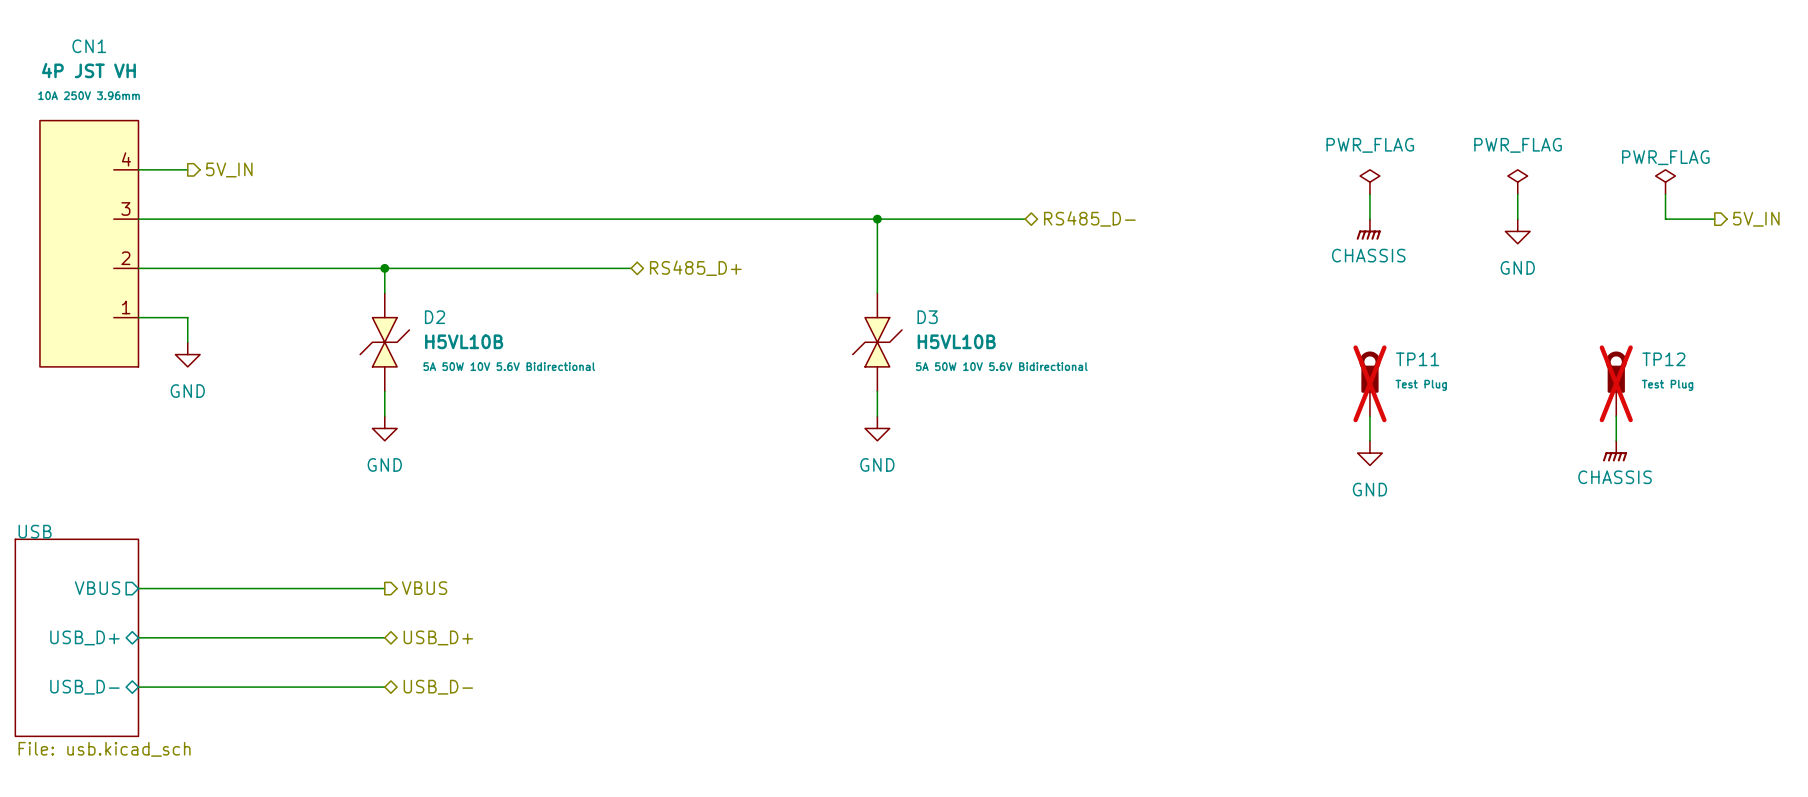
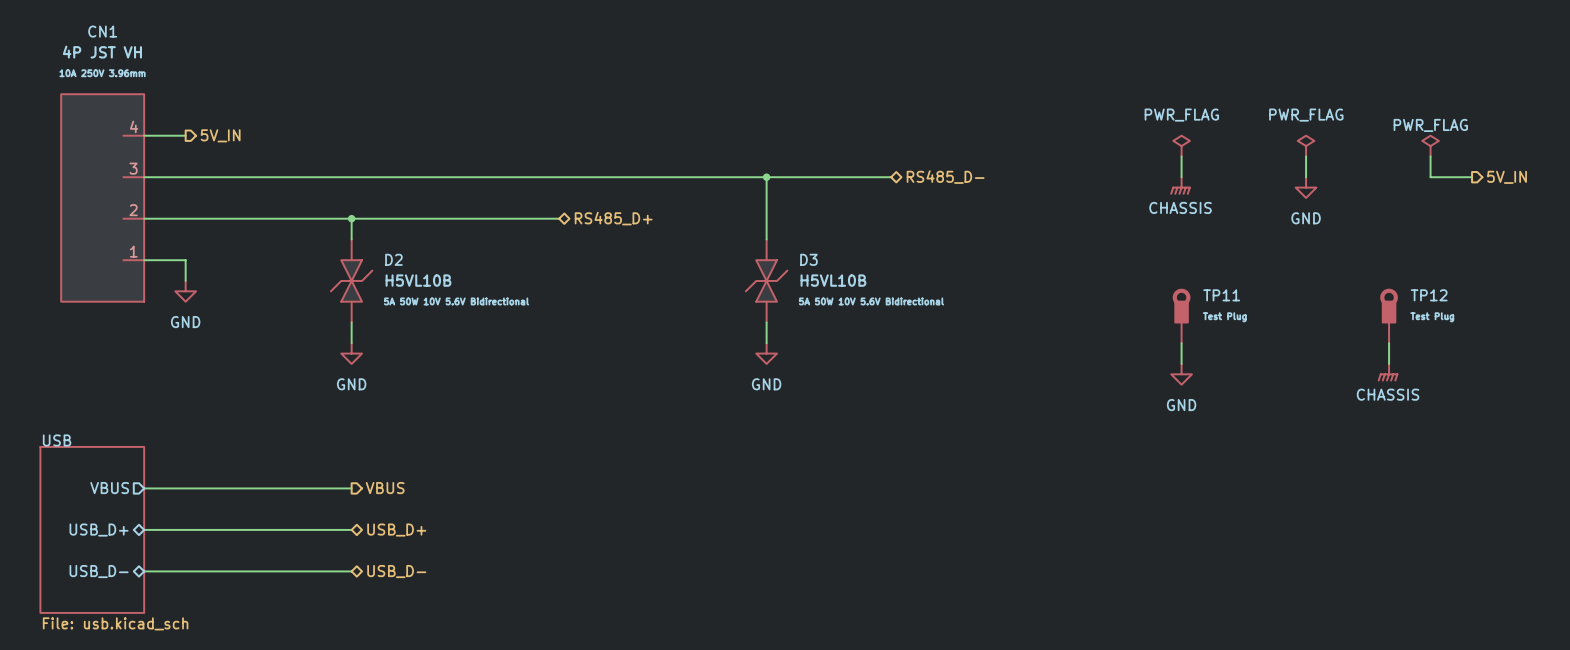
TP11 do-not-place cross: (1369, 383) -> none
TP12 do-not-place cross: (1616, 383) -> none

